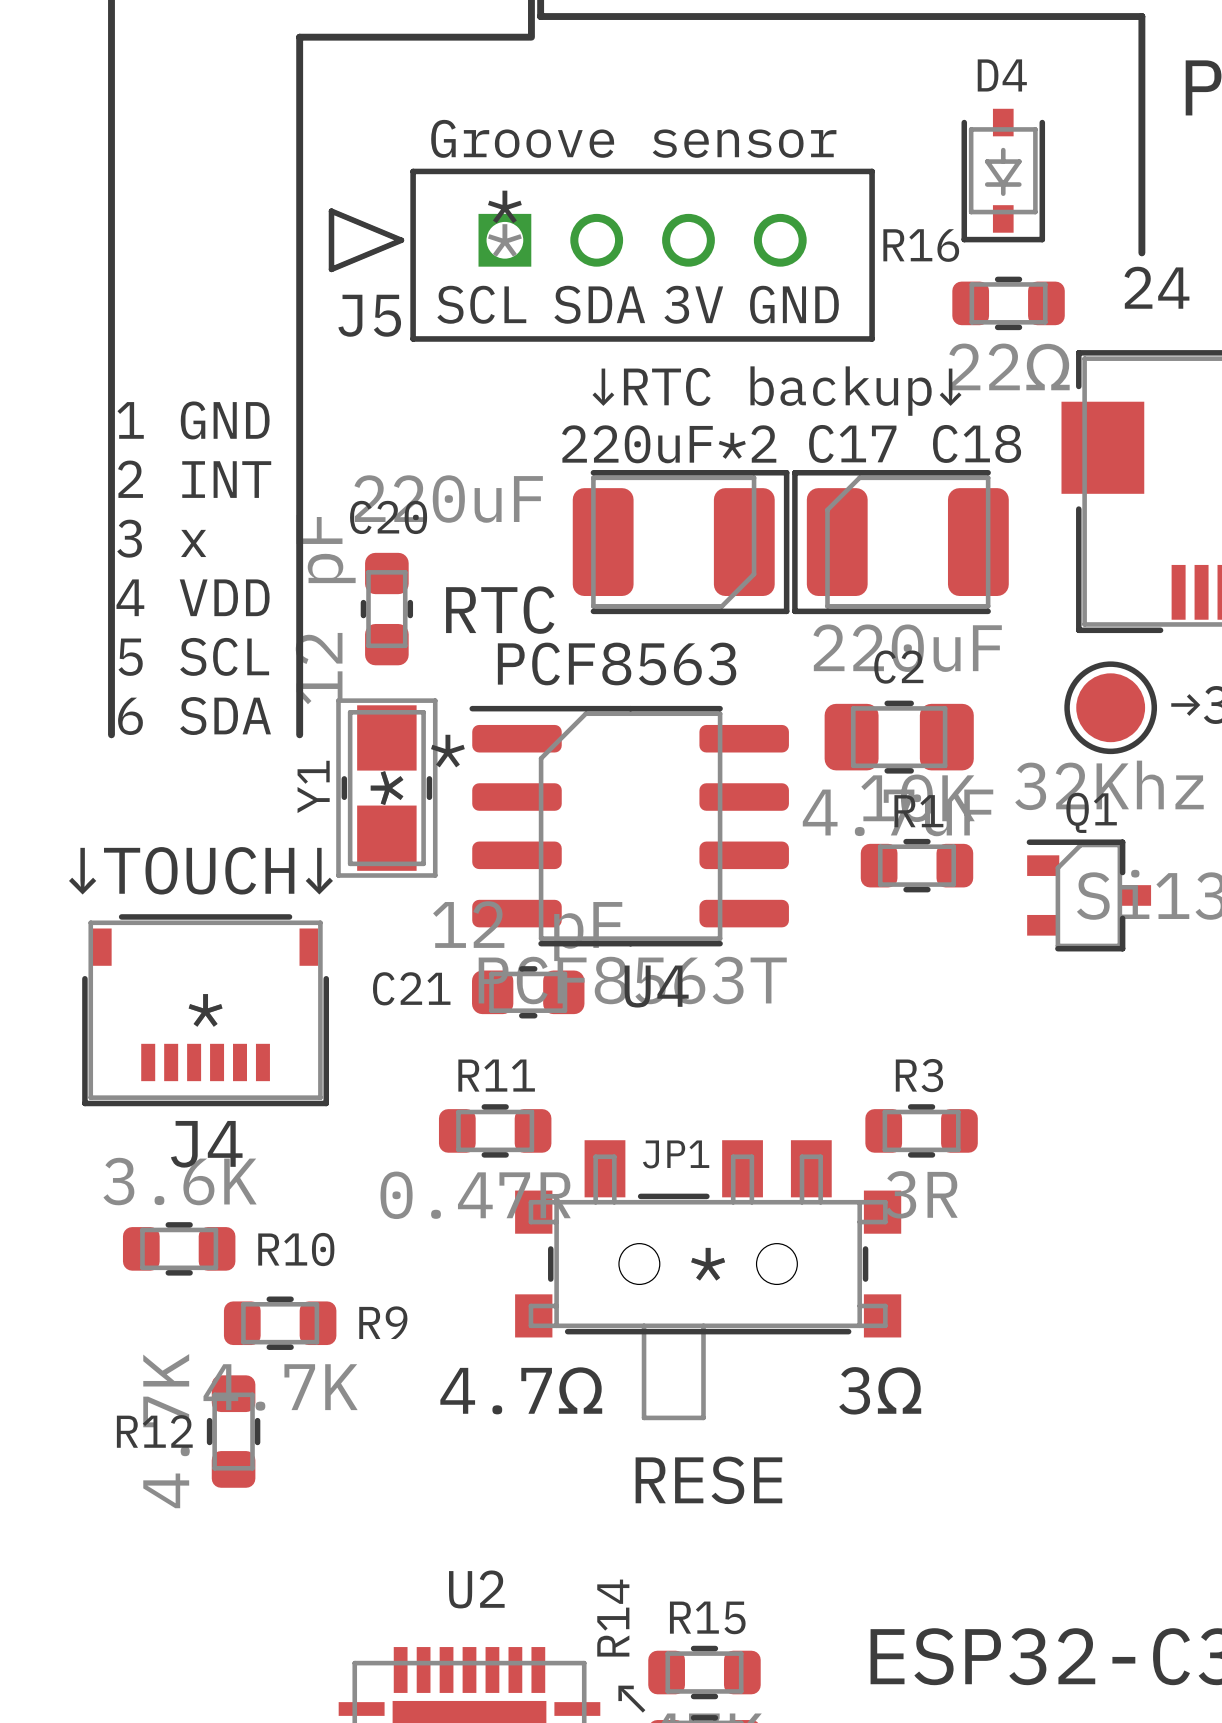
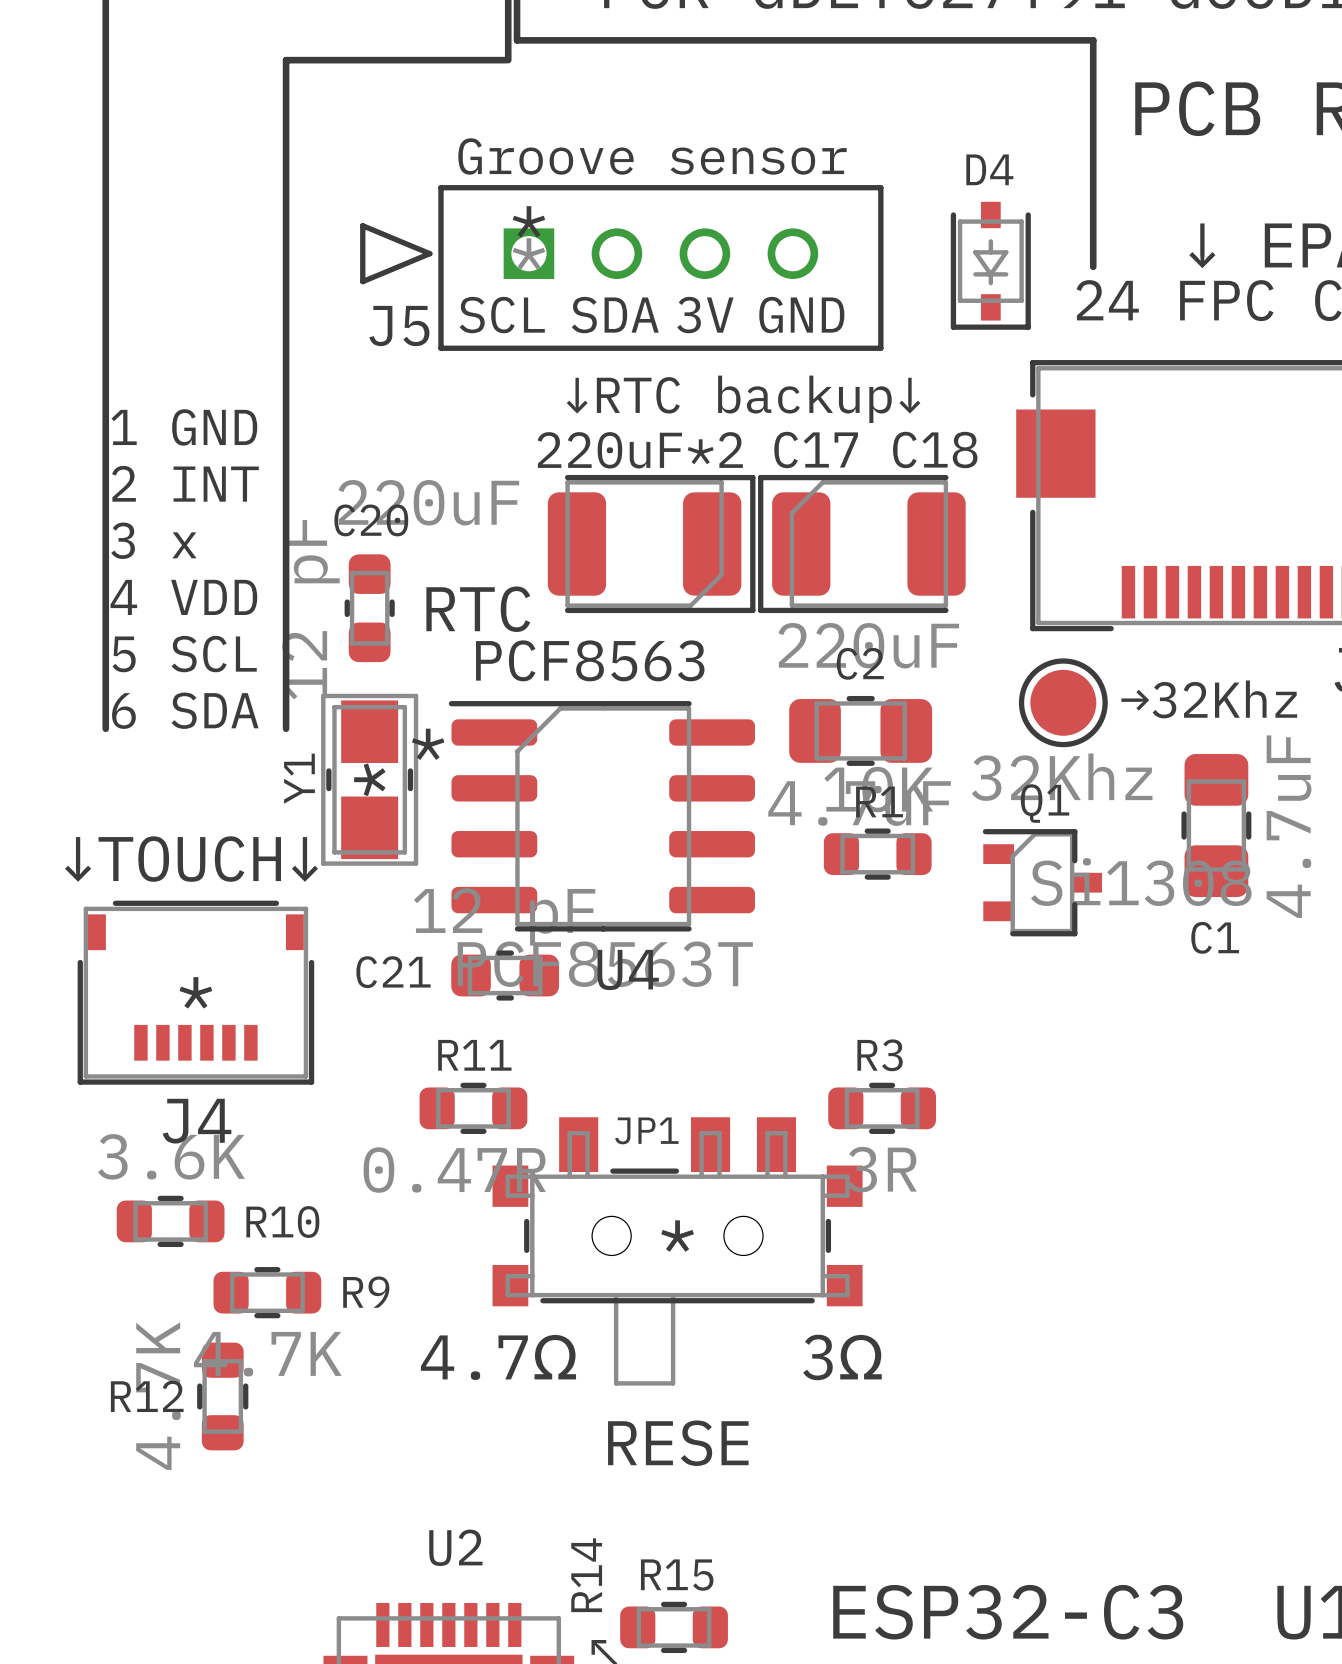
D4 position: (1003, 175) -> (990, 265)
J5 position: (601, 255) -> (621, 267)
R16: 22Ω (1008, 303) -> none
text position: SCL (481, 304) -> SCL (502, 315)
text position: SDA (599, 304) -> SDA (615, 315)
text position: 3V (693, 304) -> 3V (705, 315)
text position: GND (794, 304) -> GND (801, 315)

